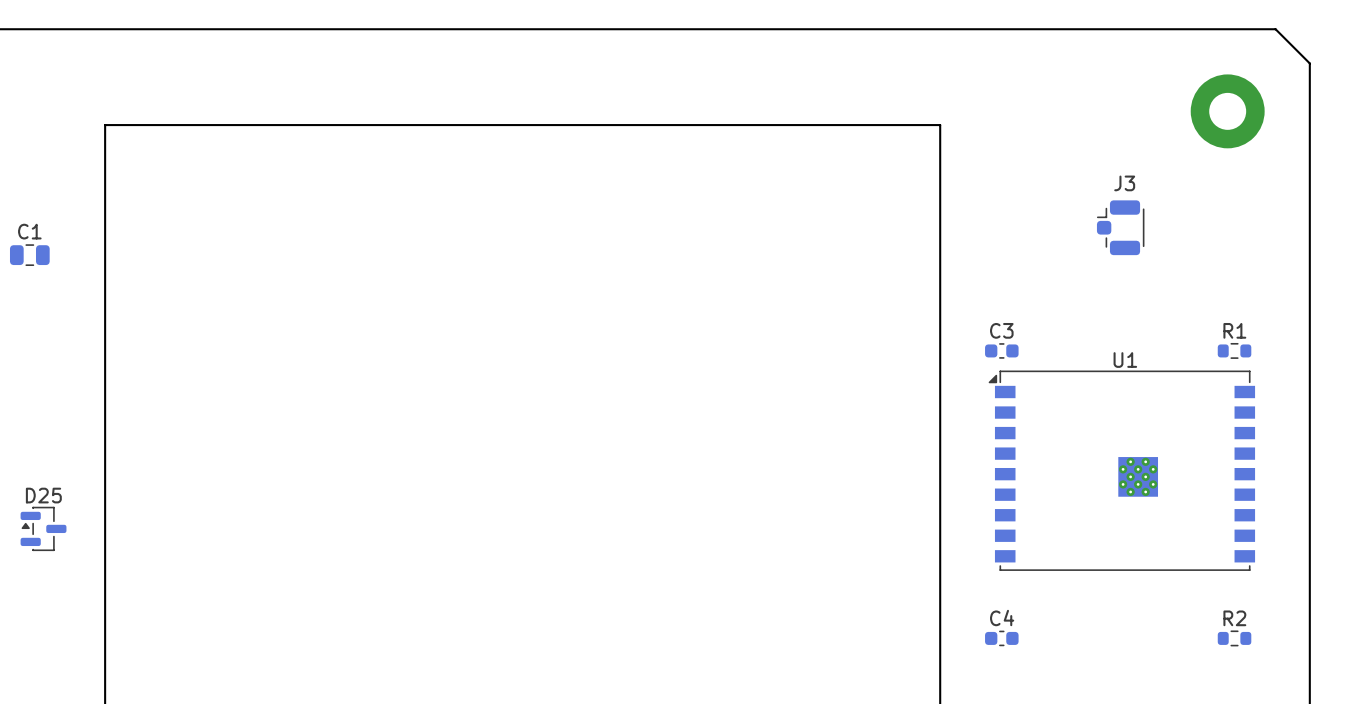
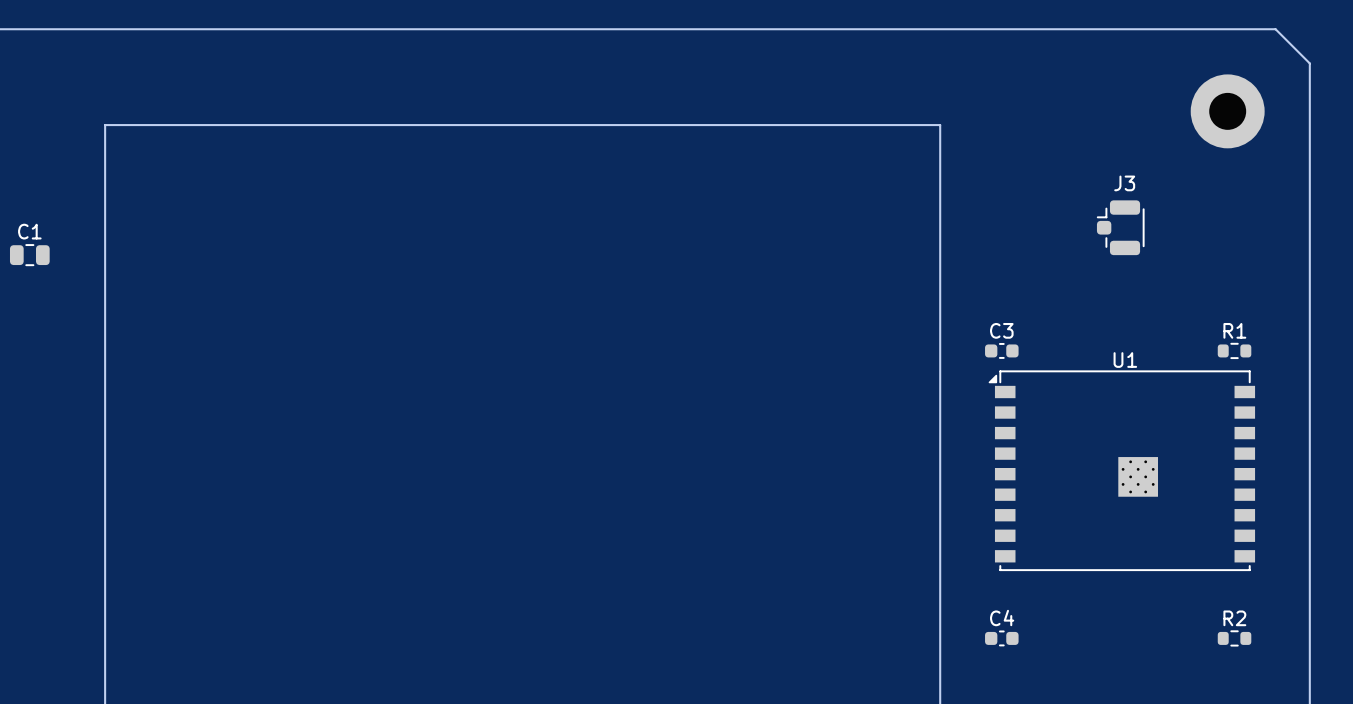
D25: (43, 528) -> none

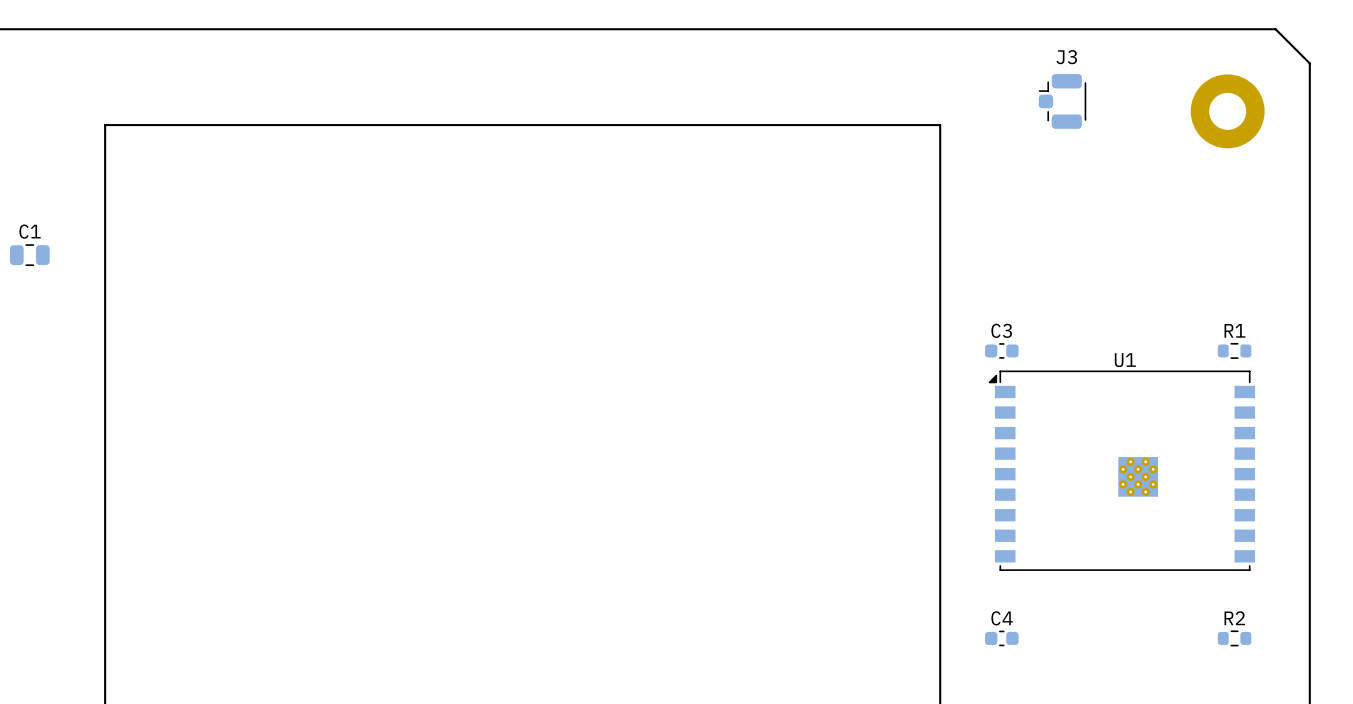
J3 position: (1120, 227) -> (1062, 101)

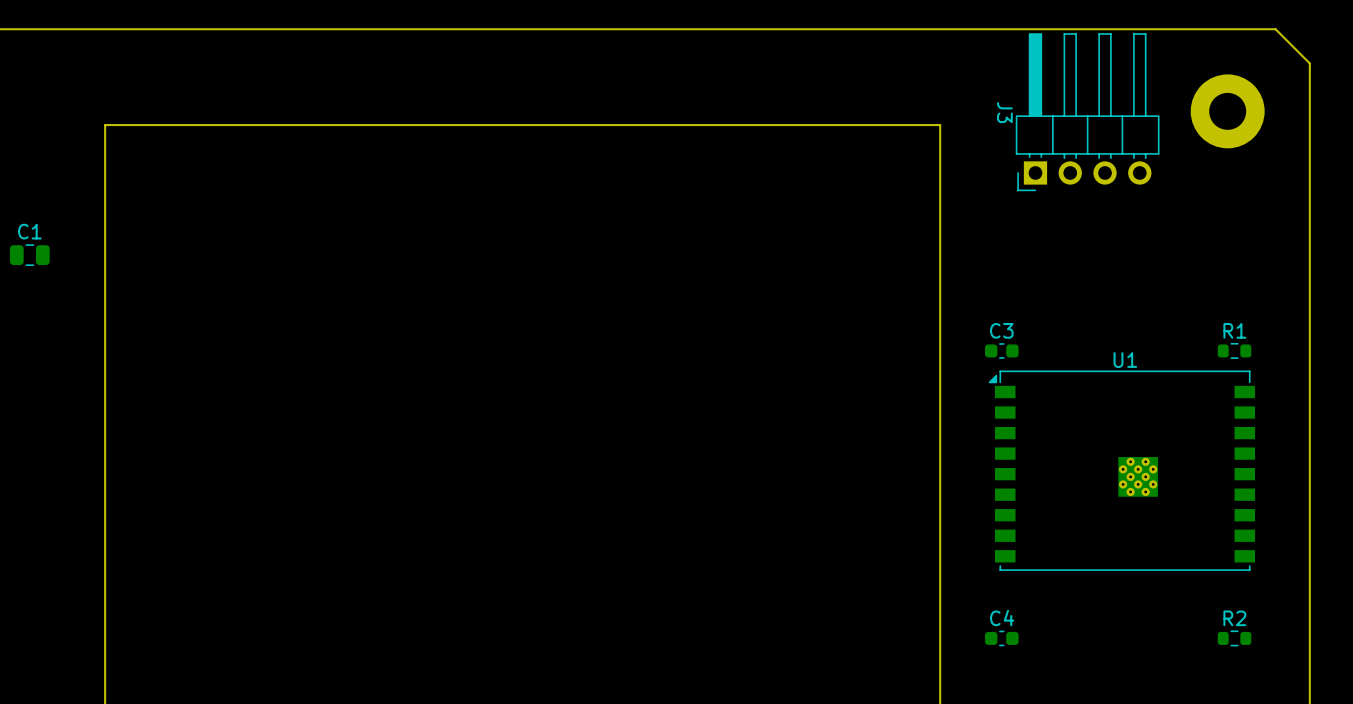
J3 name position: J3 (1066, 57) -> J3 (1004, 112)
J3 footprint: [1038, 74, 1087, 129] -> [1015, 33, 1160, 192]

